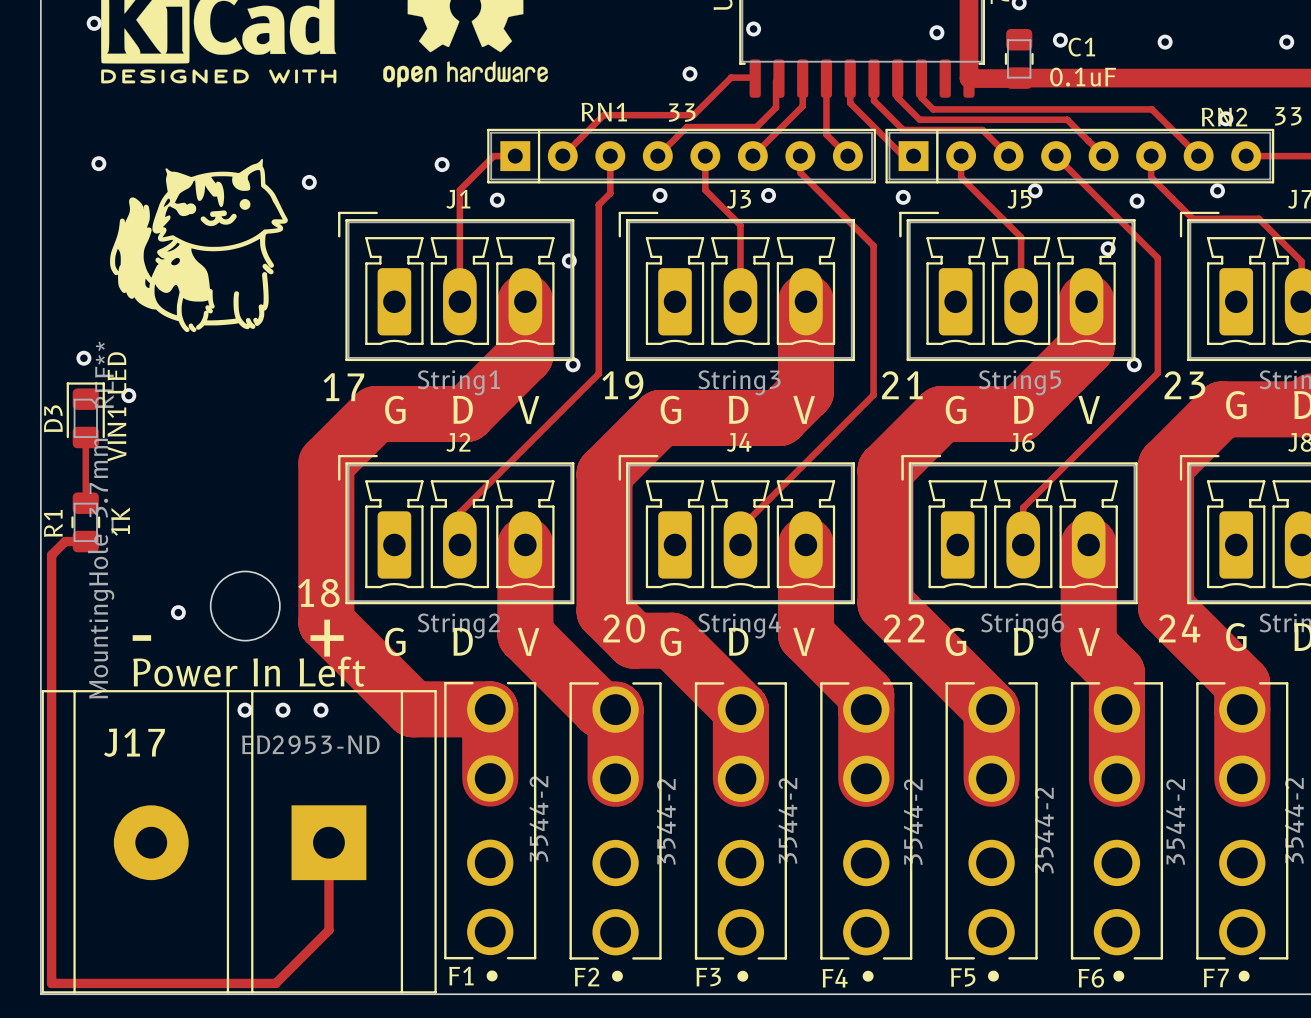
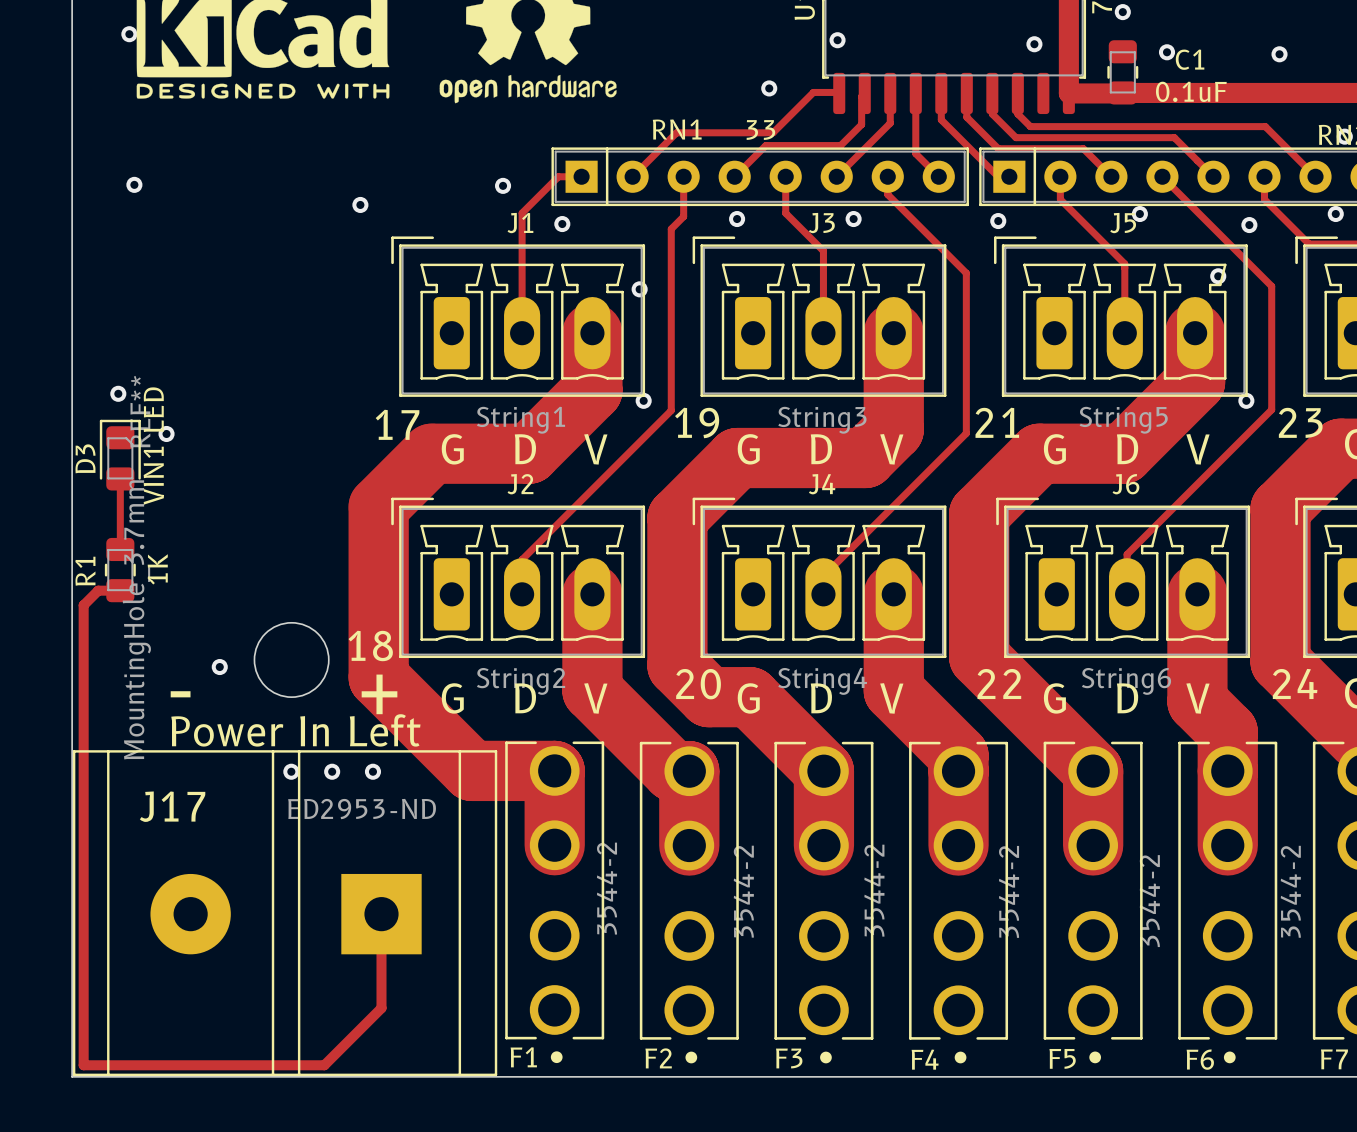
drawing: [110, 158, 288, 333] -> none

